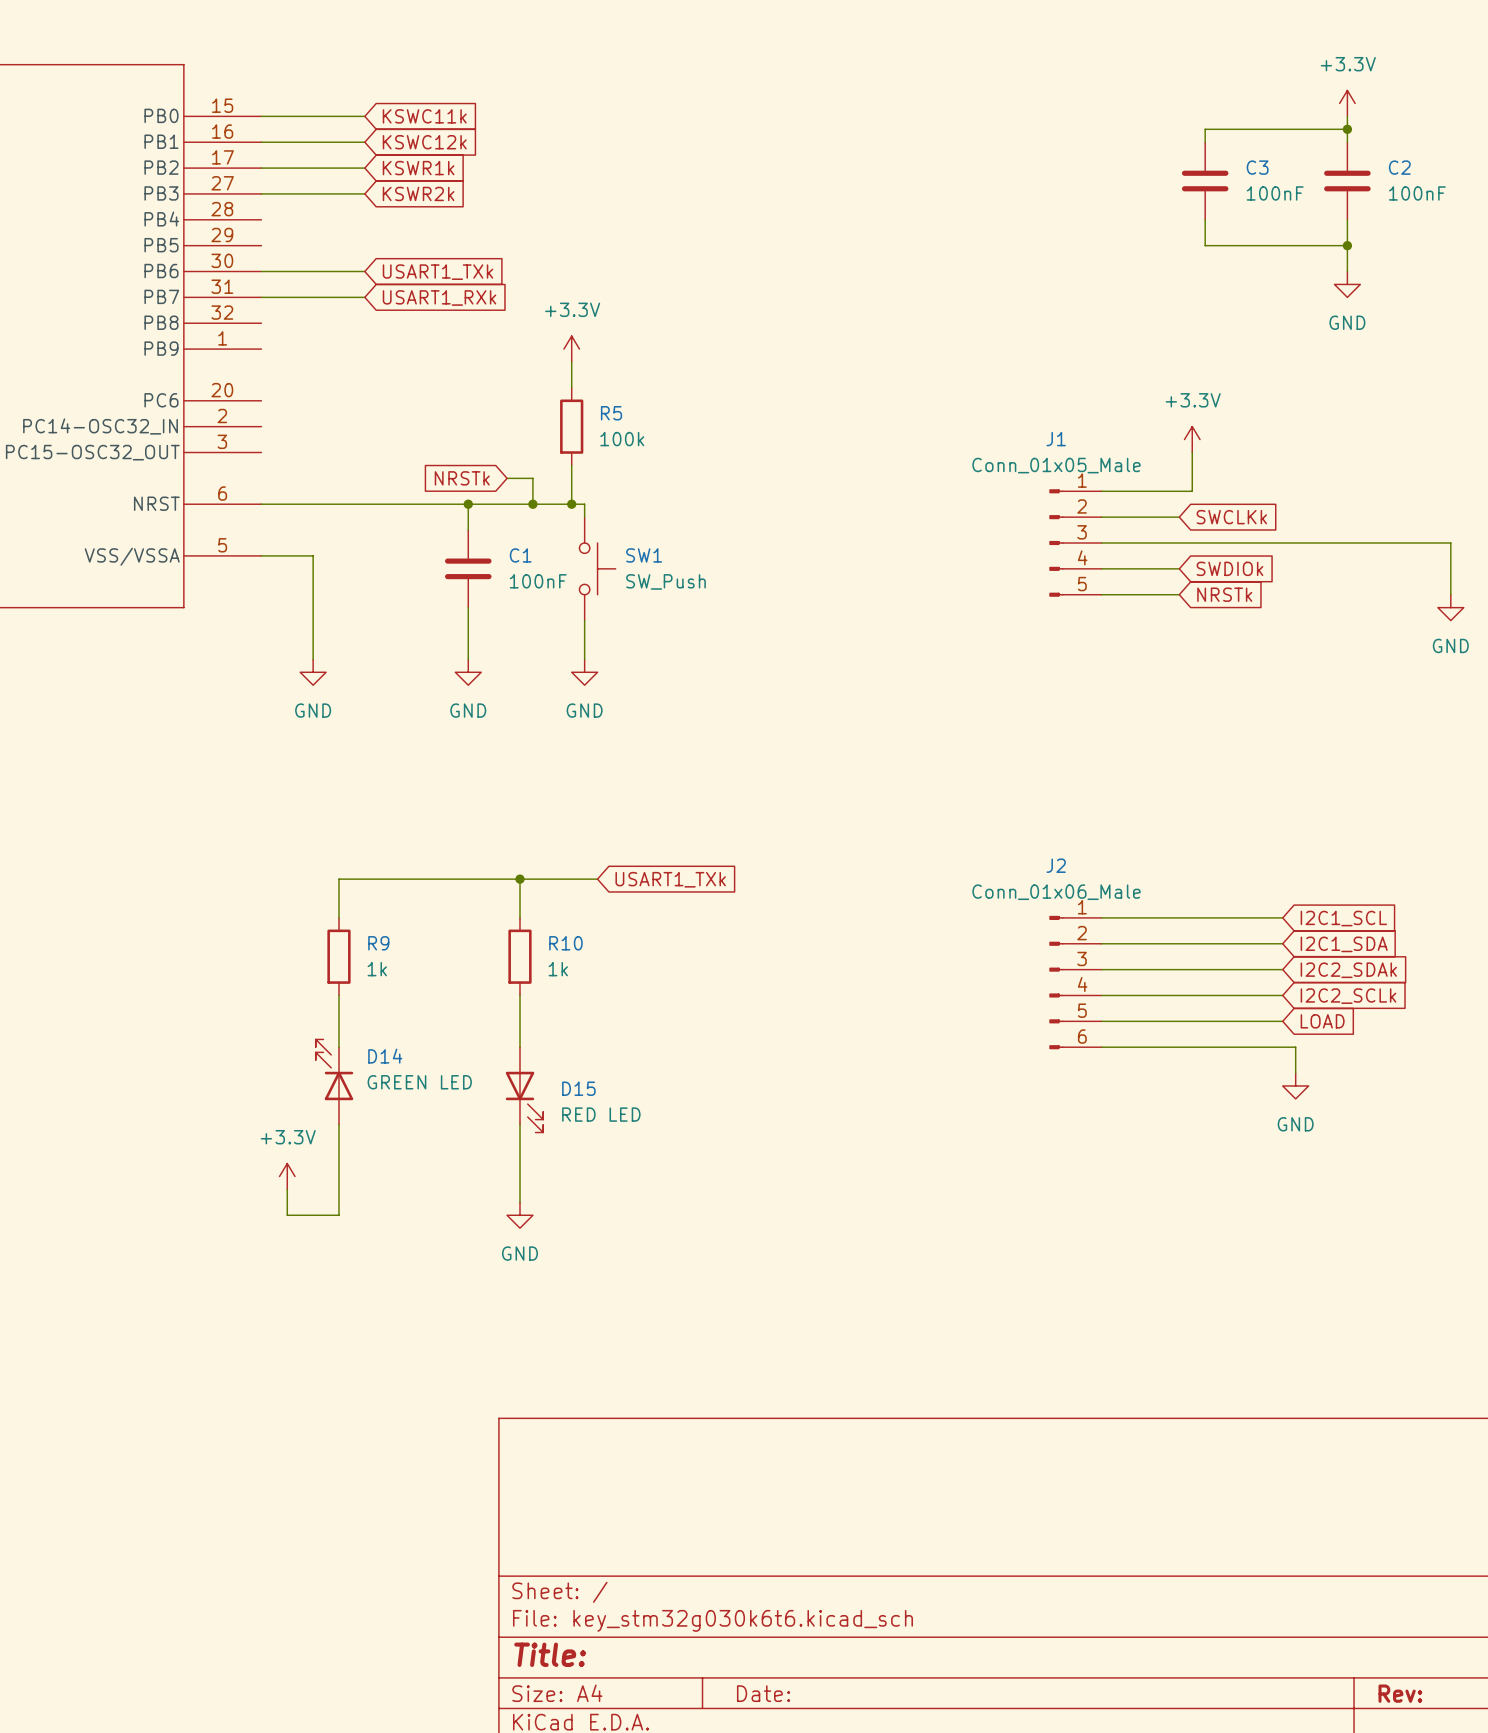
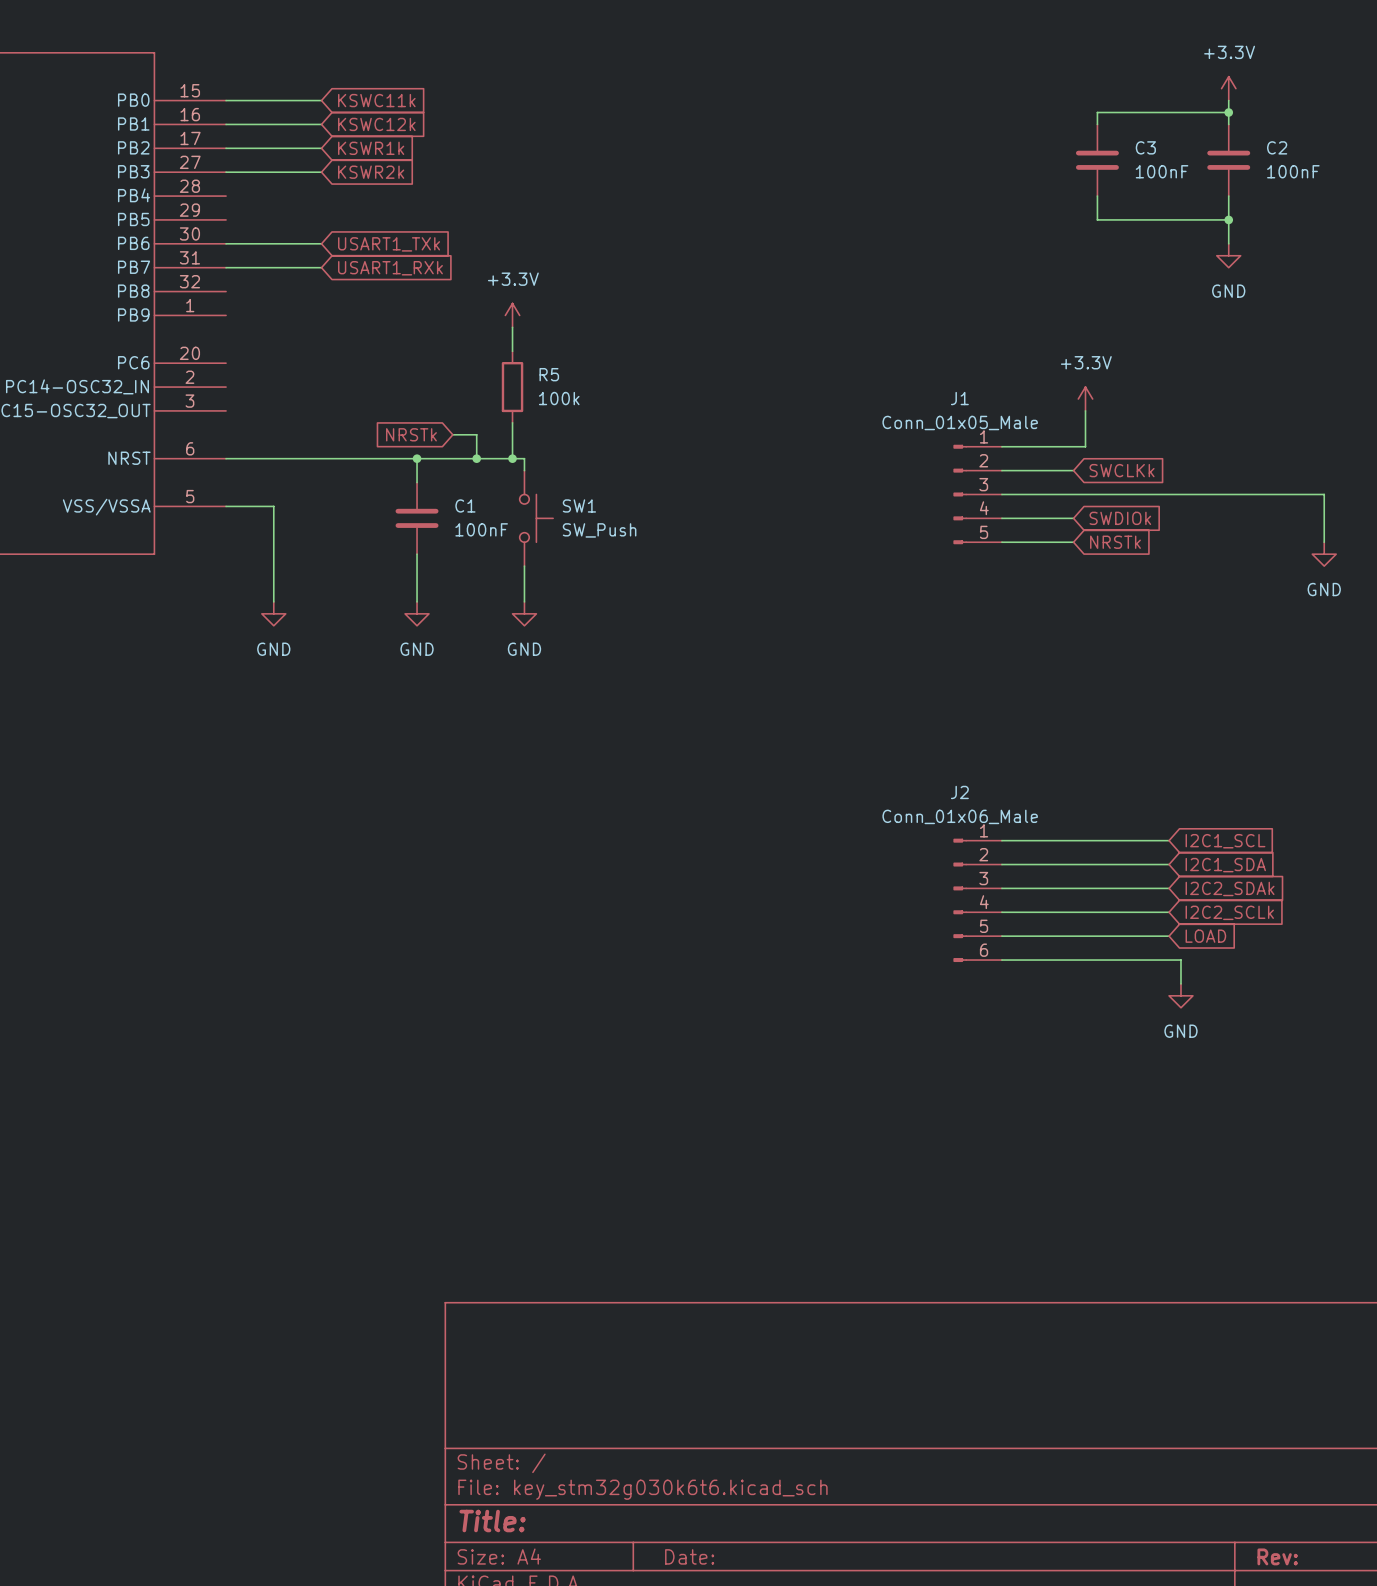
wire: (519, 879) (519, 917) -> none
junction: (519, 879) -> none
wire: (597, 879) (338, 879) (338, 917) -> none
global label: USART1_TXk (670, 879) -> none
R9: 1k (338, 956) -> none
R10: 1k (519, 956) -> none
wire: (338, 995) (338, 1047) -> none
wire: (519, 995) (519, 1047) -> none
D14: GREEN LED (334, 1082) -> none
D15: RED LED (524, 1089) -> none
wire: (338, 1124) (338, 1215) (287, 1215) (287, 1189) -> none
wire: (519, 1124) (519, 1202) -> none
power symbol: +3.3V (287, 1176) -> none
power symbol: GND (519, 1215) -> none

